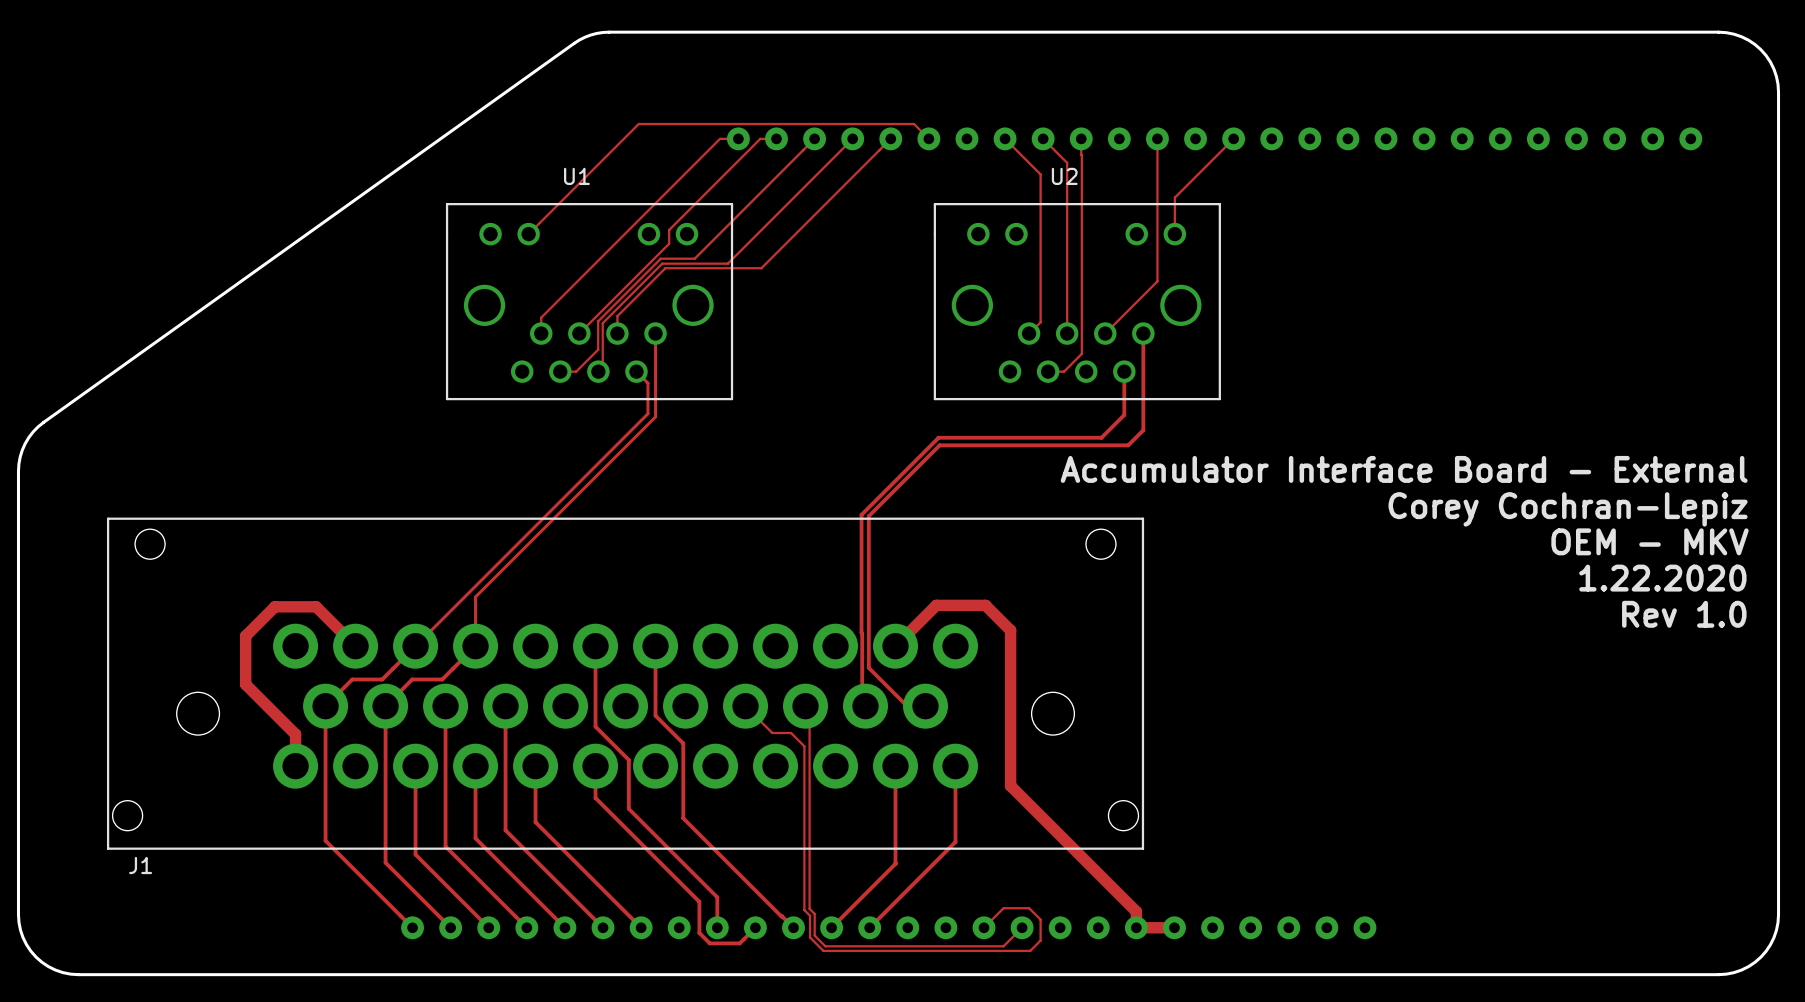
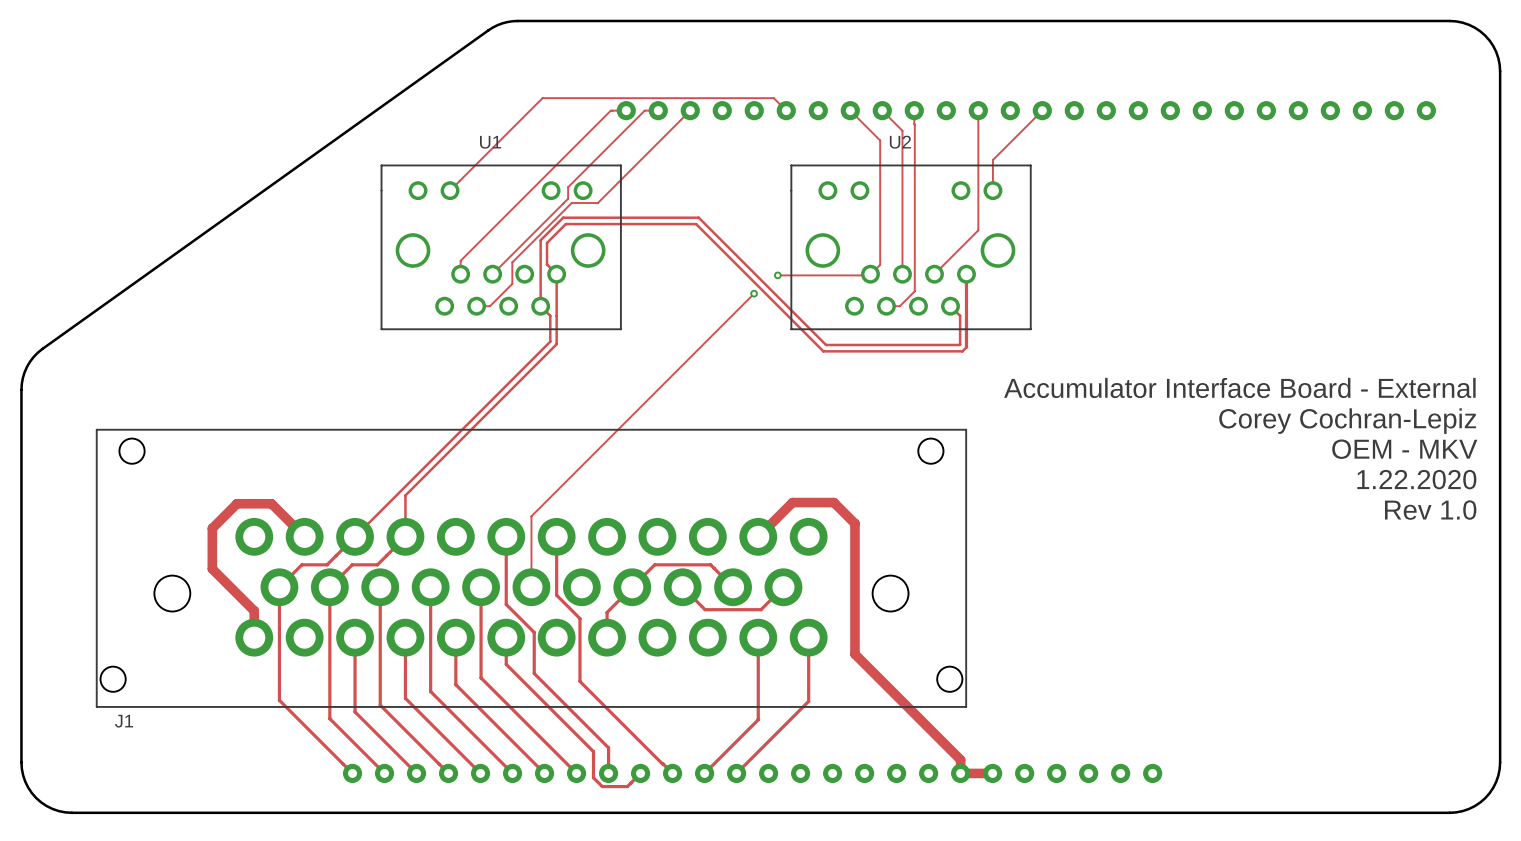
track: (852, 138) (727, 263) (662, 263) (602, 323) -> none
track: (890, 138) (761, 268) (665, 268) (617, 316) (617, 333) -> none
track: (704, 248) (694, 258) (660, 258) (598, 321) (598, 349) -> (597, 202) (571, 202) (512, 262) (512, 265)
track: none -> (870, 274) (777, 275)
via: none -> (777, 275)
track: (602, 345) (602, 367) (598, 371) -> (512, 283) (508, 287)
track: none -> (754, 293) (531, 516) (531, 587)
via: none -> (754, 293)
track: (1124, 371) (1124, 414) (1101, 437) (938, 437) (861, 514) (862, 702) -> (950, 306) (960, 315) (959, 344) (826, 344) (698, 217) (563, 217) (540, 240) (540, 306)
track: (1143, 420) (1143, 430) (1128, 445) (939, 445) (868, 516) (868, 667) (907, 706) (925, 706) -> (966, 347) (962, 351) (823, 351) (696, 224) (565, 224) (547, 242) (547, 264) (556, 274)
track: none -> (730, 584) (710, 564) (654, 564) (607, 612) (607, 637)
track: none -> (481, 587) (481, 677) (576, 773)
track: (745, 706) (772, 732) (791, 732) (804, 746) (804, 910) (810, 915) (810, 937) (823, 950) (1030, 950) (1040, 940) (1040, 919) (1029, 908) (1003, 908) (983, 927) -> none
track: (809, 710) (809, 908) (814, 913) (814, 935) (825, 946) (1003, 946) (1022, 927) -> (686, 590) (705, 609) (761, 609) (783, 587)

